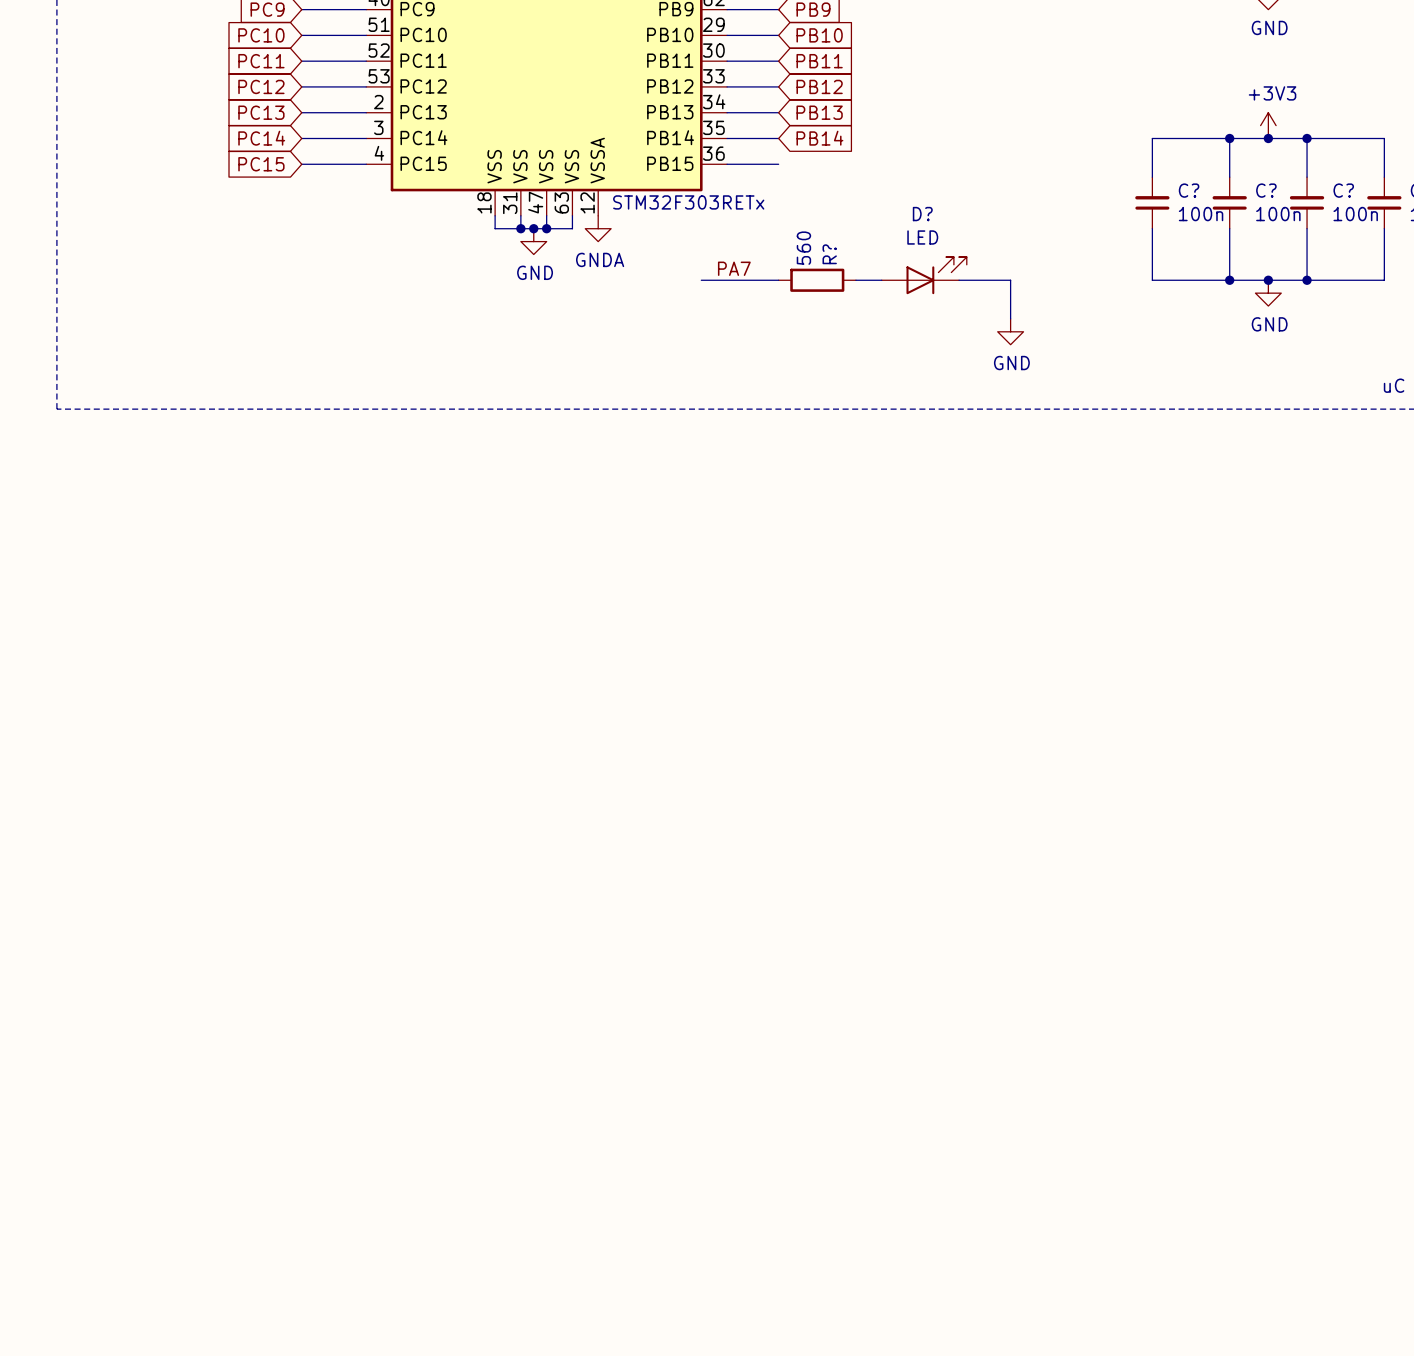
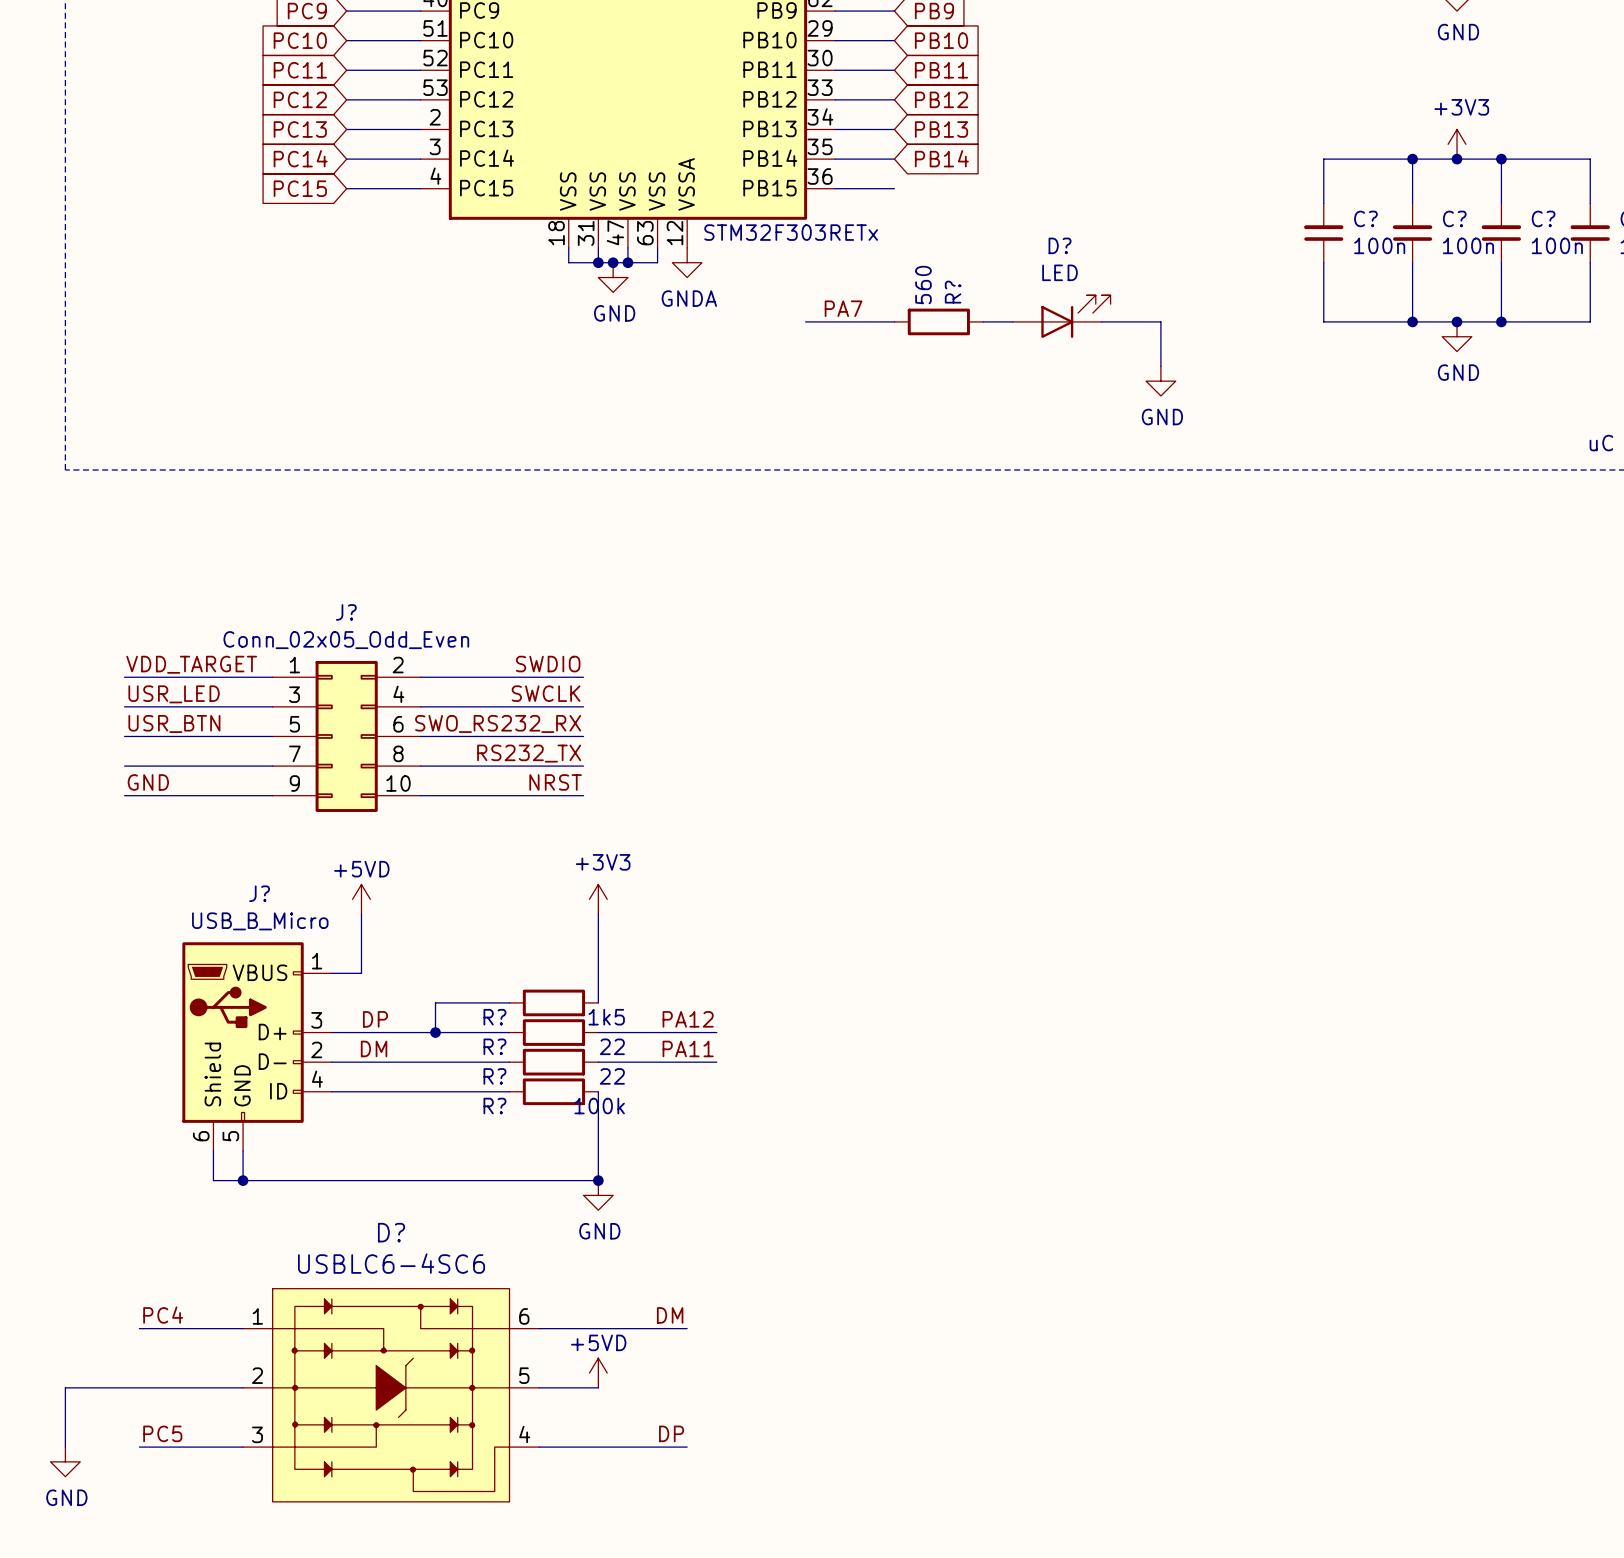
label: none -> VDD_TARGET (191, 664)
label: none -> SWDIO (548, 664)
wire: none -> (124, 677) (272, 677)
wire: none -> (420, 677) (583, 677)
label: none -> SWCLK (546, 693)
label: none -> USR_LED (174, 694)
wire: none -> (124, 706) (272, 706)
wire: none -> (420, 706) (583, 706)
label: none -> USR_BTN (174, 723)
label: none -> SWO_RS232_RX (498, 723)
wire: none -> (124, 736) (272, 736)
J?: none -> Conn_02x05_Odd_Even (346, 736)
wire: none -> (420, 736) (583, 736)
label: none -> RS232_TX (529, 753)
wire: none -> (124, 766) (272, 766)
wire: none -> (420, 766) (583, 766)
label: none -> GND (148, 782)
label: none -> NRST (555, 782)
wire: none -> (124, 795) (272, 795)
wire: none -> (420, 795) (583, 795)
power symbol: none -> +5VD (361, 899)
power symbol: none -> +3V3 (598, 899)
wire: none -> (361, 914) (361, 973) (331, 973)
wire: none -> (598, 914) (598, 1002)
wire: none -> (509, 1002) (435, 1002) (435, 1032)
R?: none -> 1k5 (553, 1002)
label: none -> DP (375, 1019)
label: none -> PA12 (688, 1019)
wire: none -> (331, 1032) (509, 1032)
junction: none -> (435, 1032)
R?: none -> 22 (553, 1032)
wire: none -> (598, 1032) (716, 1032)
J?: none -> USB_B_Micro (257, 1046)
label: none -> DM (374, 1048)
label: none -> PA11 (688, 1048)
wire: none -> (331, 1062) (509, 1062)
R?: none -> 22 (553, 1062)
wire: none -> (598, 1062) (716, 1062)
wire: none -> (331, 1091) (509, 1091)
R?: none -> 100k (553, 1091)
wire: none -> (598, 1091) (598, 1180) (213, 1180) (213, 1150)
wire: none -> (243, 1150) (243, 1180)
junction: none -> (243, 1180)
junction: none -> (598, 1180)
power symbol: none -> GND (598, 1195)
label: none -> PC4 (163, 1315)
label: none -> DM (670, 1315)
wire: none -> (139, 1328) (243, 1328)
wire: none -> (539, 1328) (687, 1328)
power symbol: none -> +5VD (598, 1373)
wire: none -> (243, 1387) (65, 1387) (65, 1447)
wire: none -> (539, 1387) (598, 1387)
D?: none -> USBLC6-4SC6 (391, 1395)
label: none -> PC5 (162, 1433)
label: none -> DP (671, 1433)
wire: none -> (139, 1447) (243, 1447)
wire: none -> (539, 1447) (687, 1447)
power symbol: none -> GND (65, 1461)

